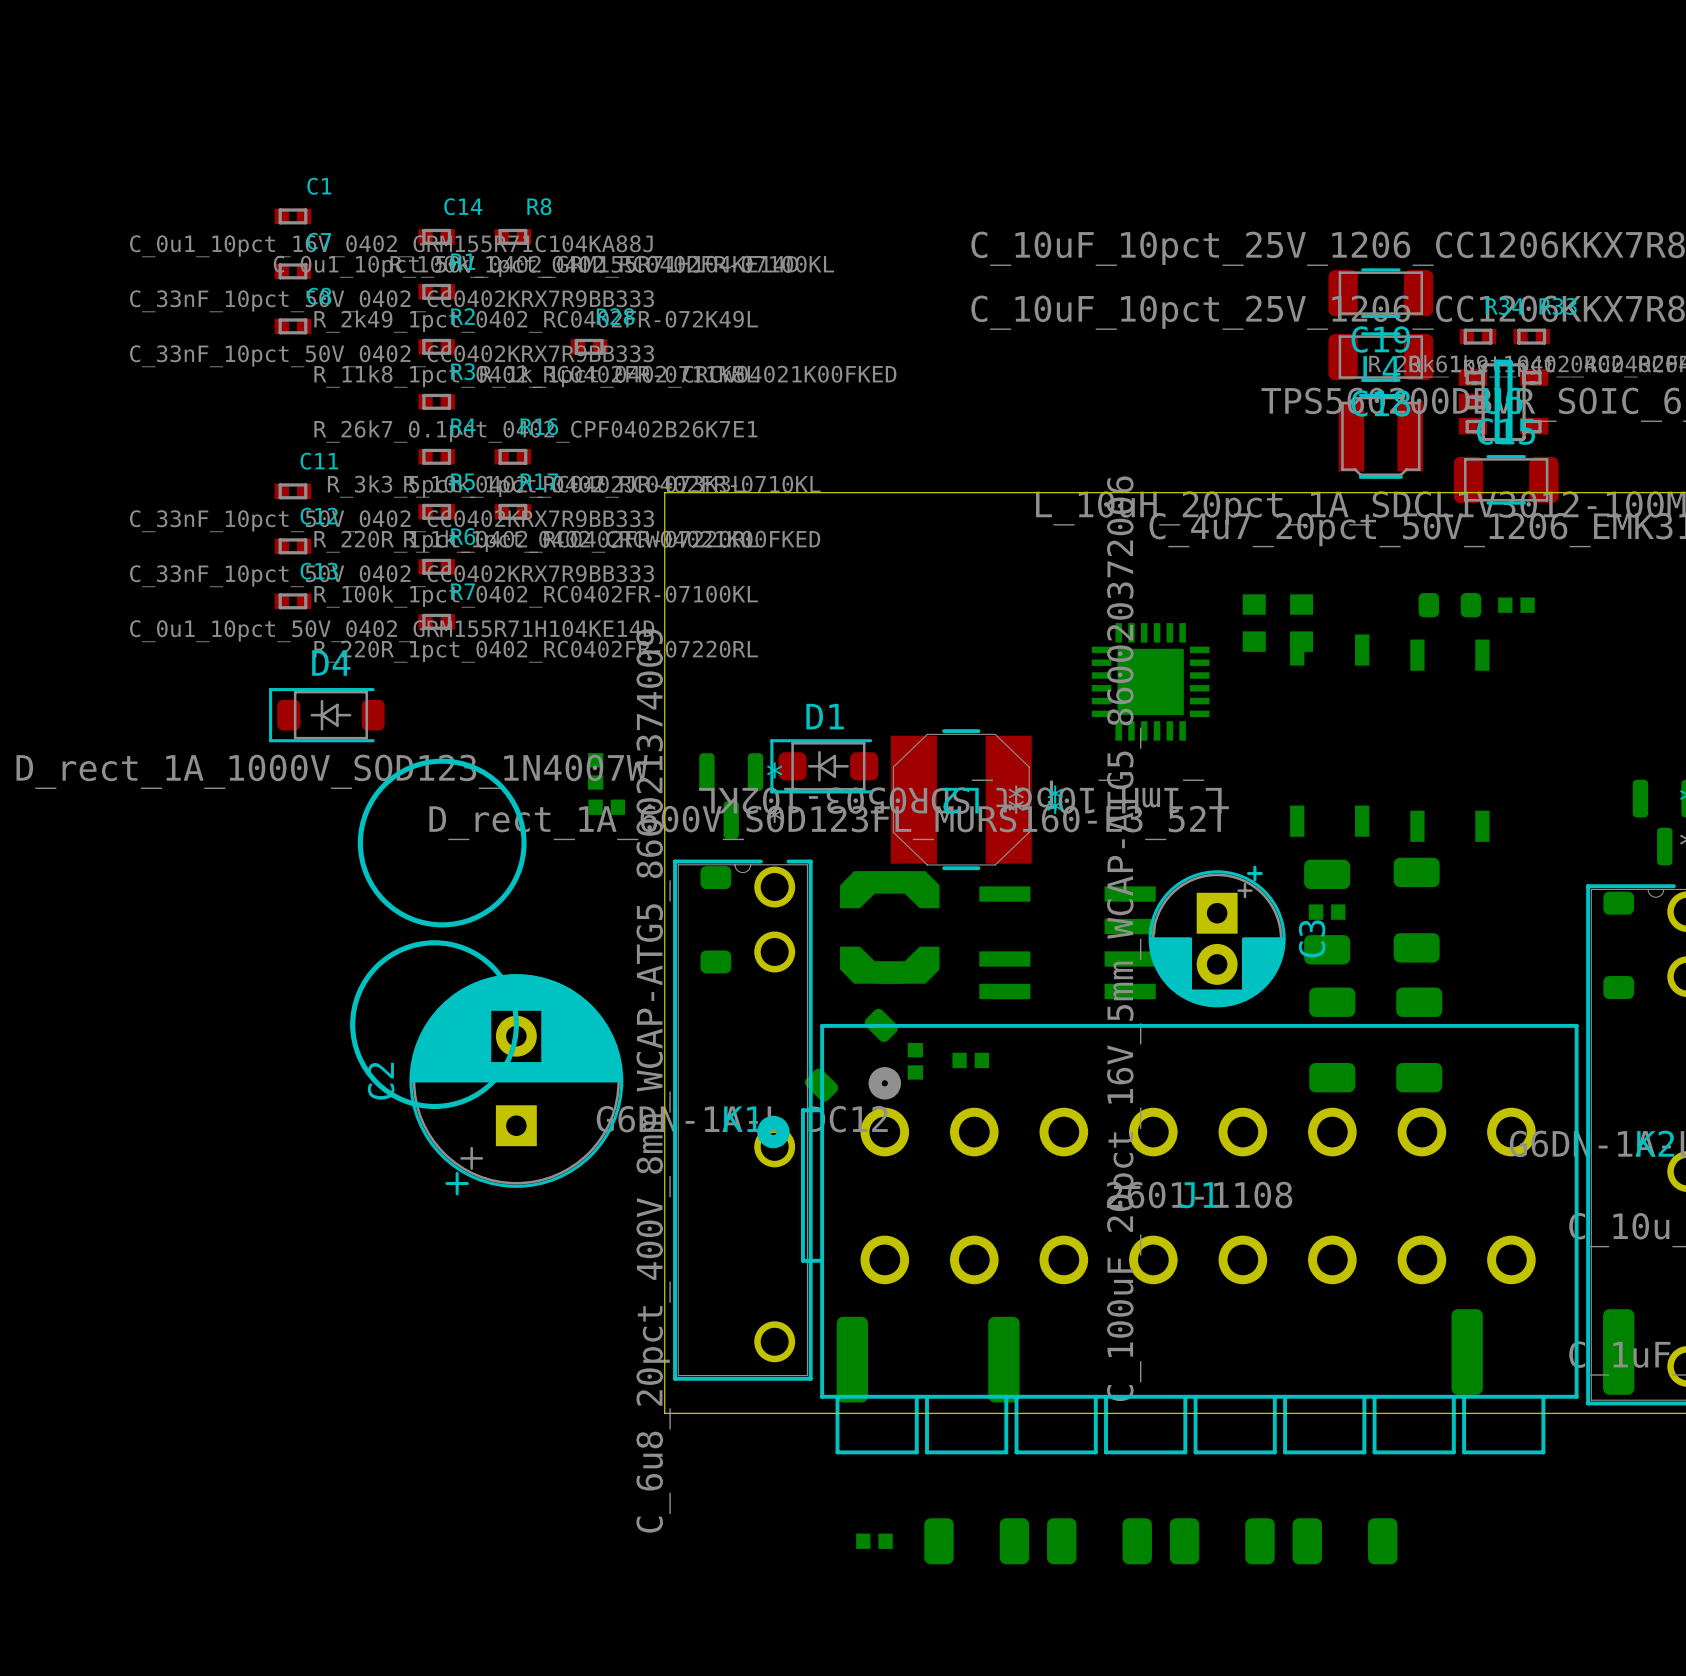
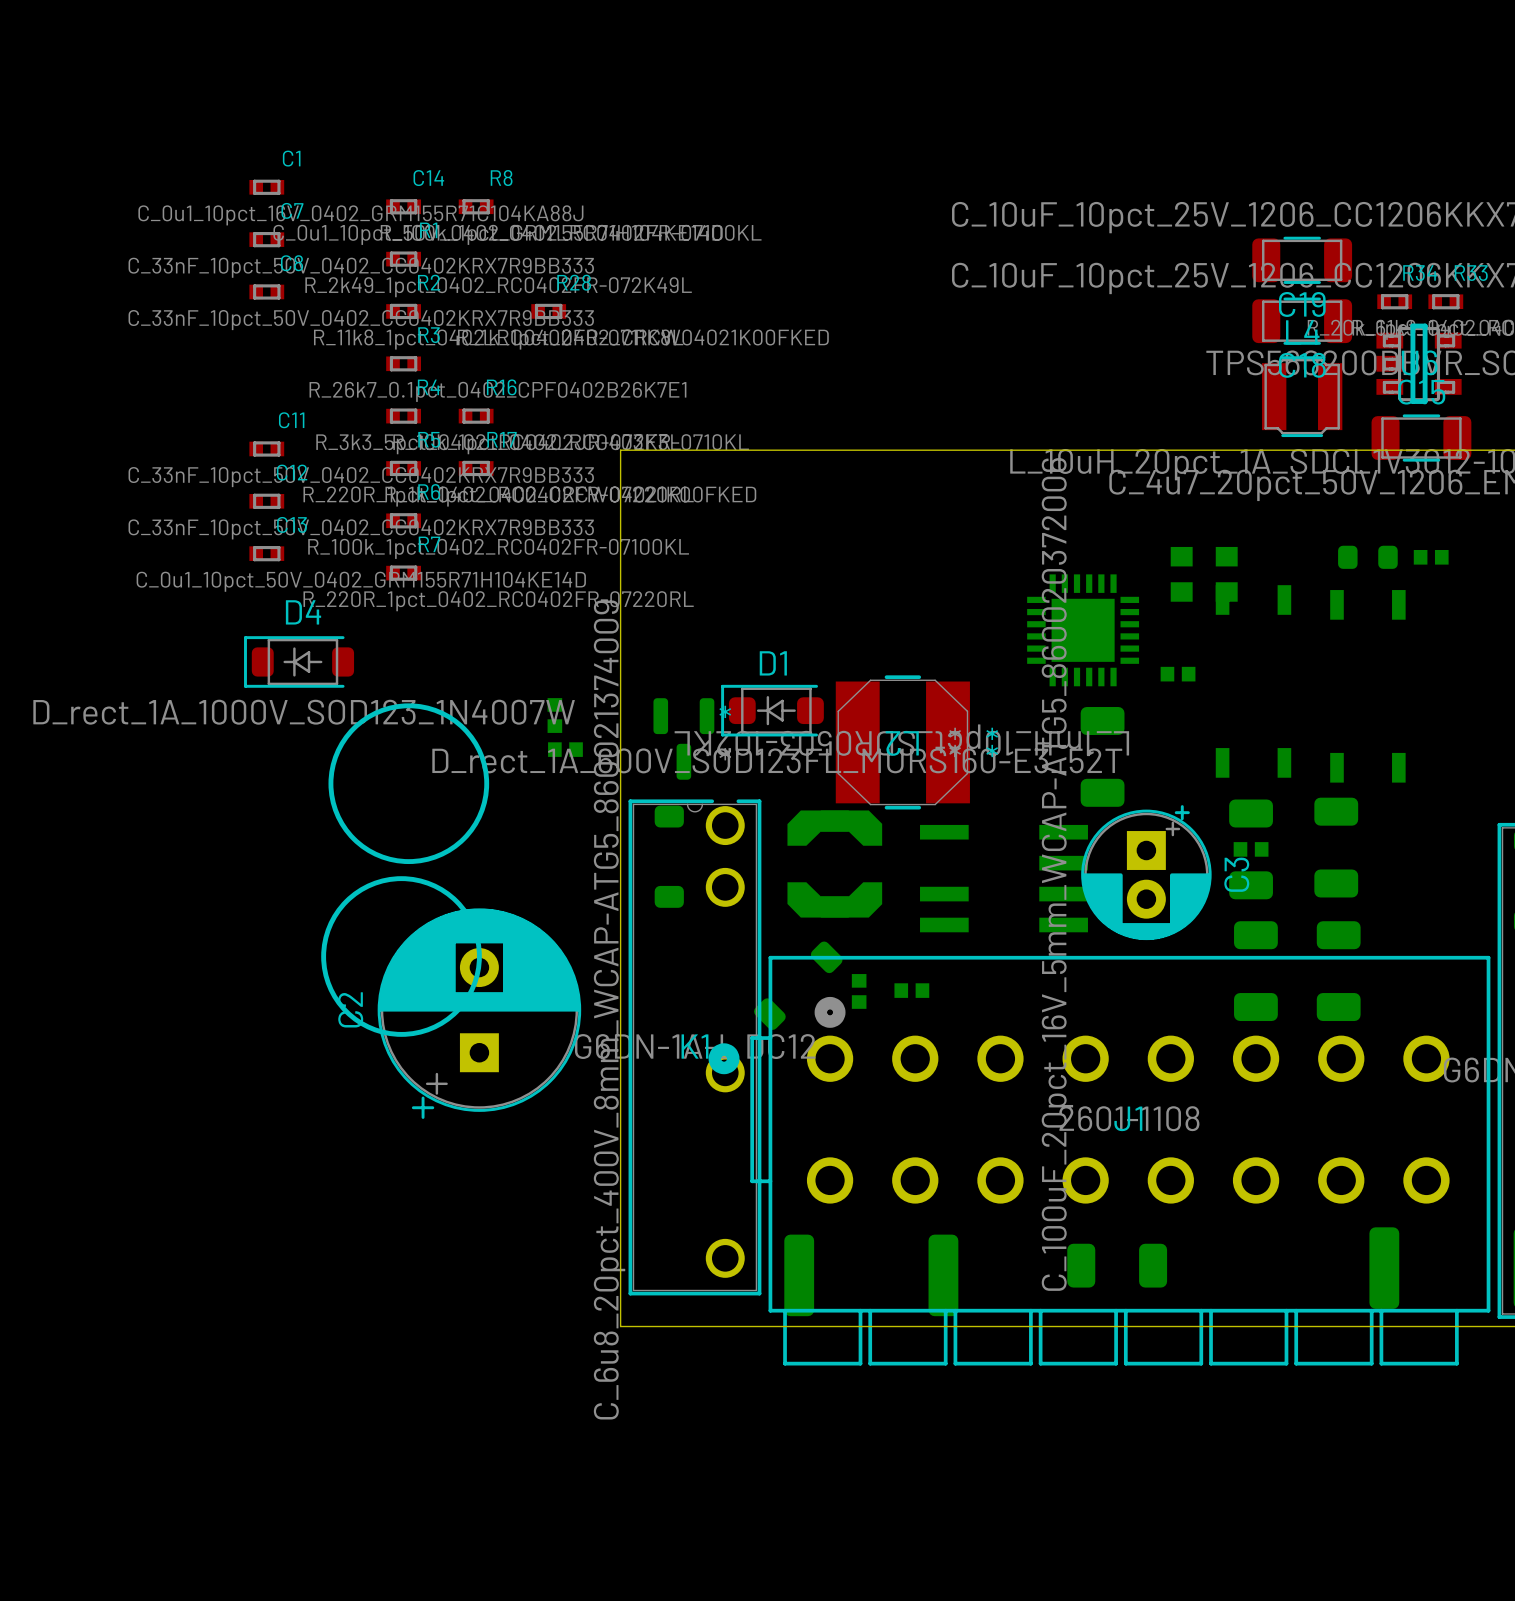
part: none -> (1178, 674)
part: none -> (1102, 756)
part: none -> (1117, 1265)
part: (874, 1541) -> none
part: (976, 1541) -> none
part: (1099, 1541) -> none
part: (1222, 1541) -> none
part: (1345, 1541) -> none

